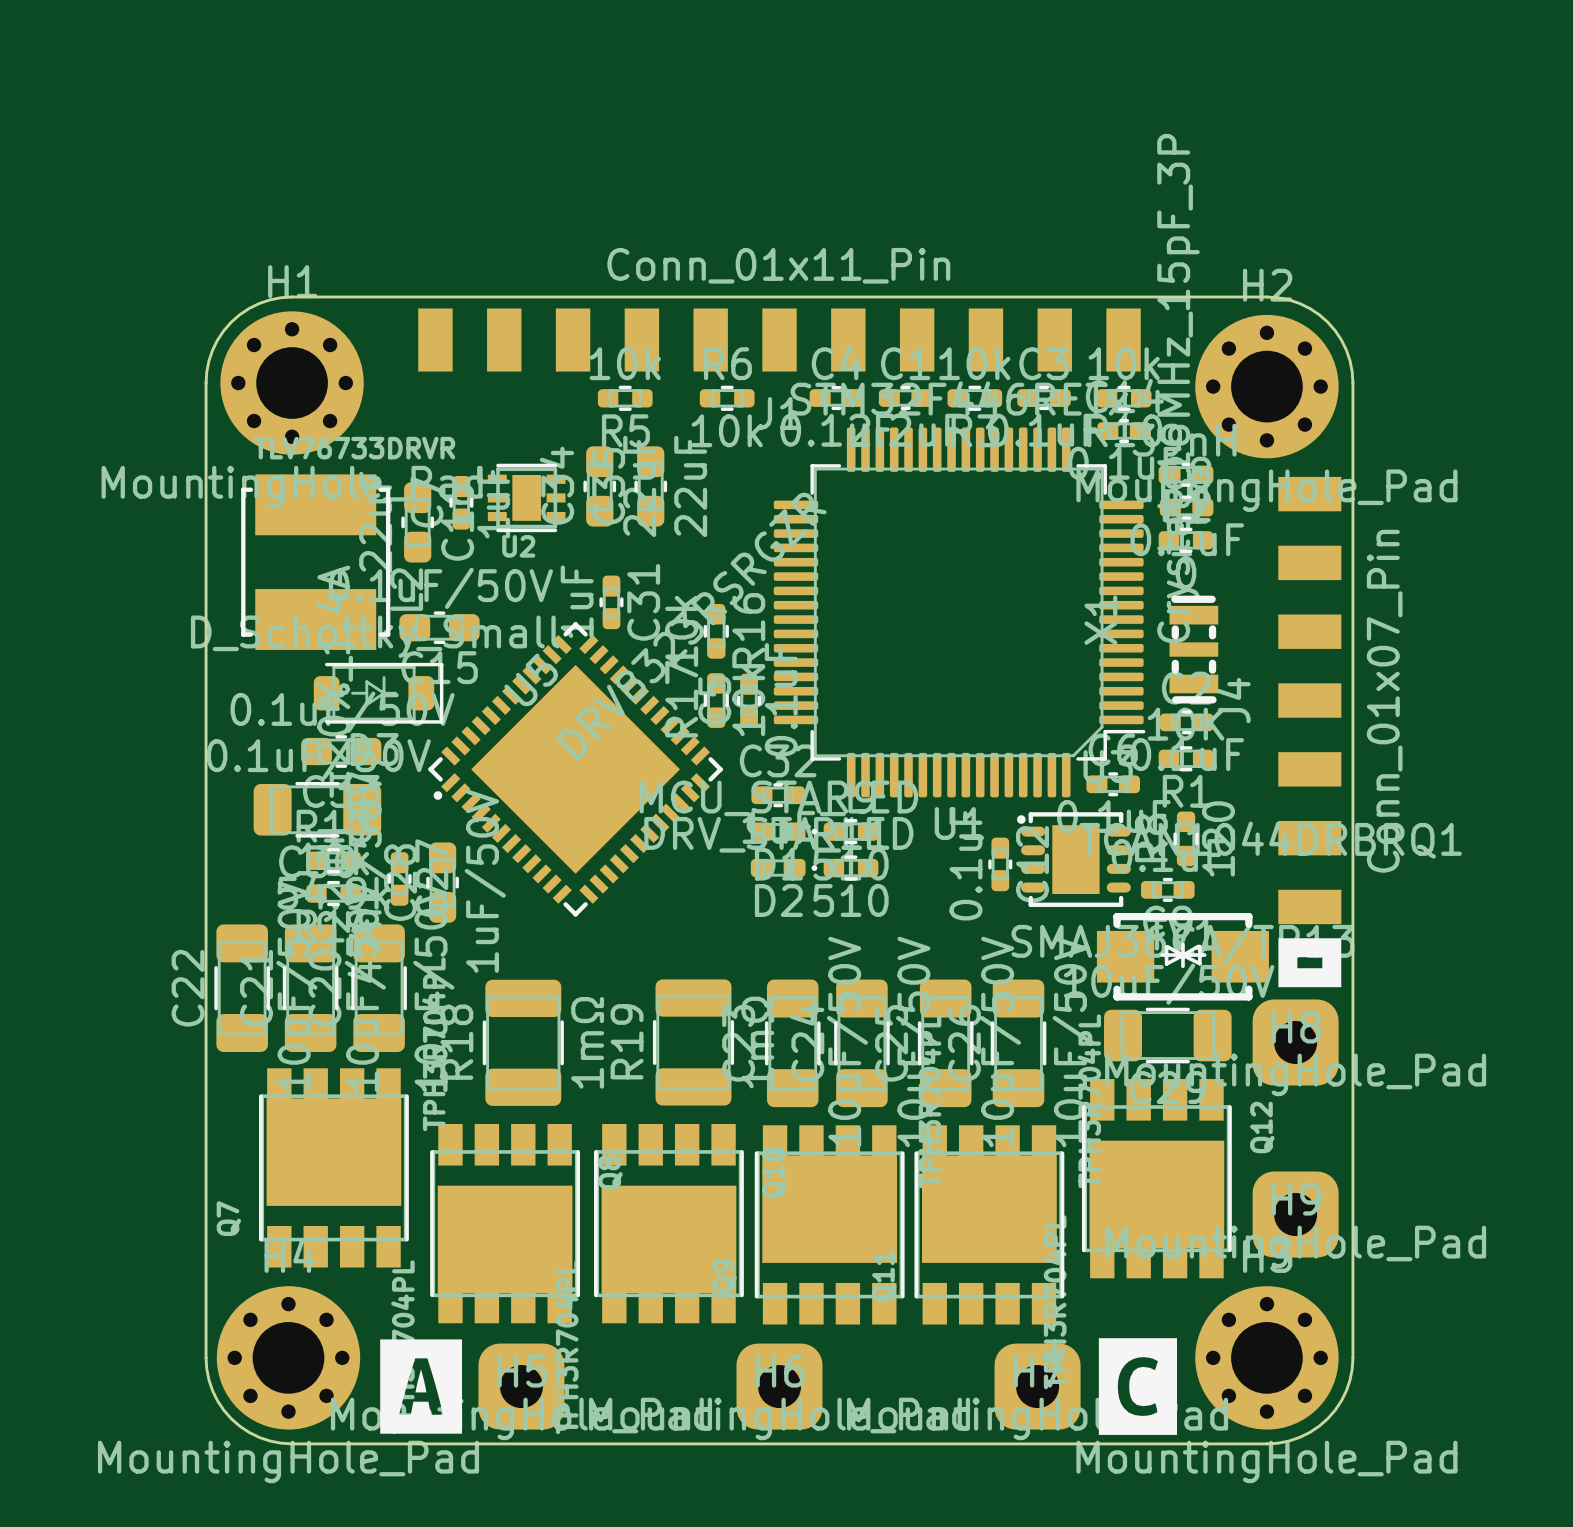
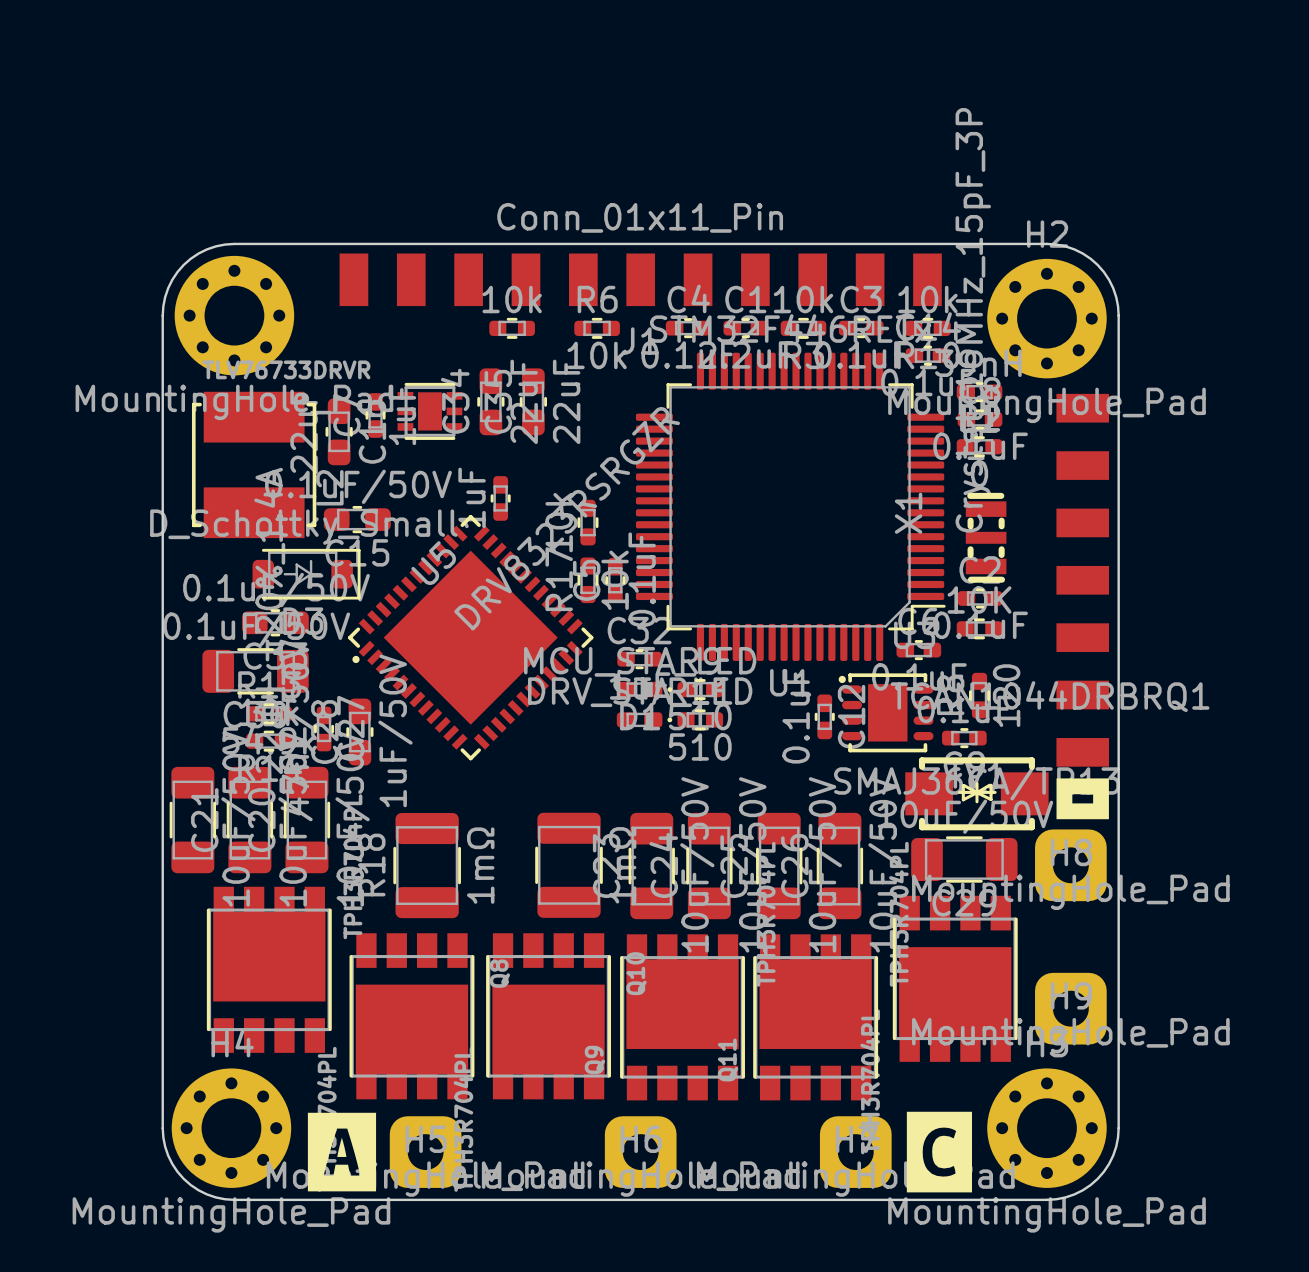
H1 name: H1 (292, 281) -> none
R5 name: R5 (625, 430) -> none
U2 name: U2 (518, 546) -> none
C31 name: C31 (643, 602) -> none
R16 name: R16 (748, 630) -> none
J4 name: J4 (1233, 700) -> none
J4 value: Conn_01x07_Pin (1384, 701) -> none
R1 name: R1 (1186, 791) -> none
D2 name: D2 (778, 900) -> none
C22 name: C22 (188, 988) -> none
R19 name: R19 (627, 1041) -> none
Q12 name: Q12 (1262, 1127) -> none
Q7 name: Q7 (228, 1218) -> none

